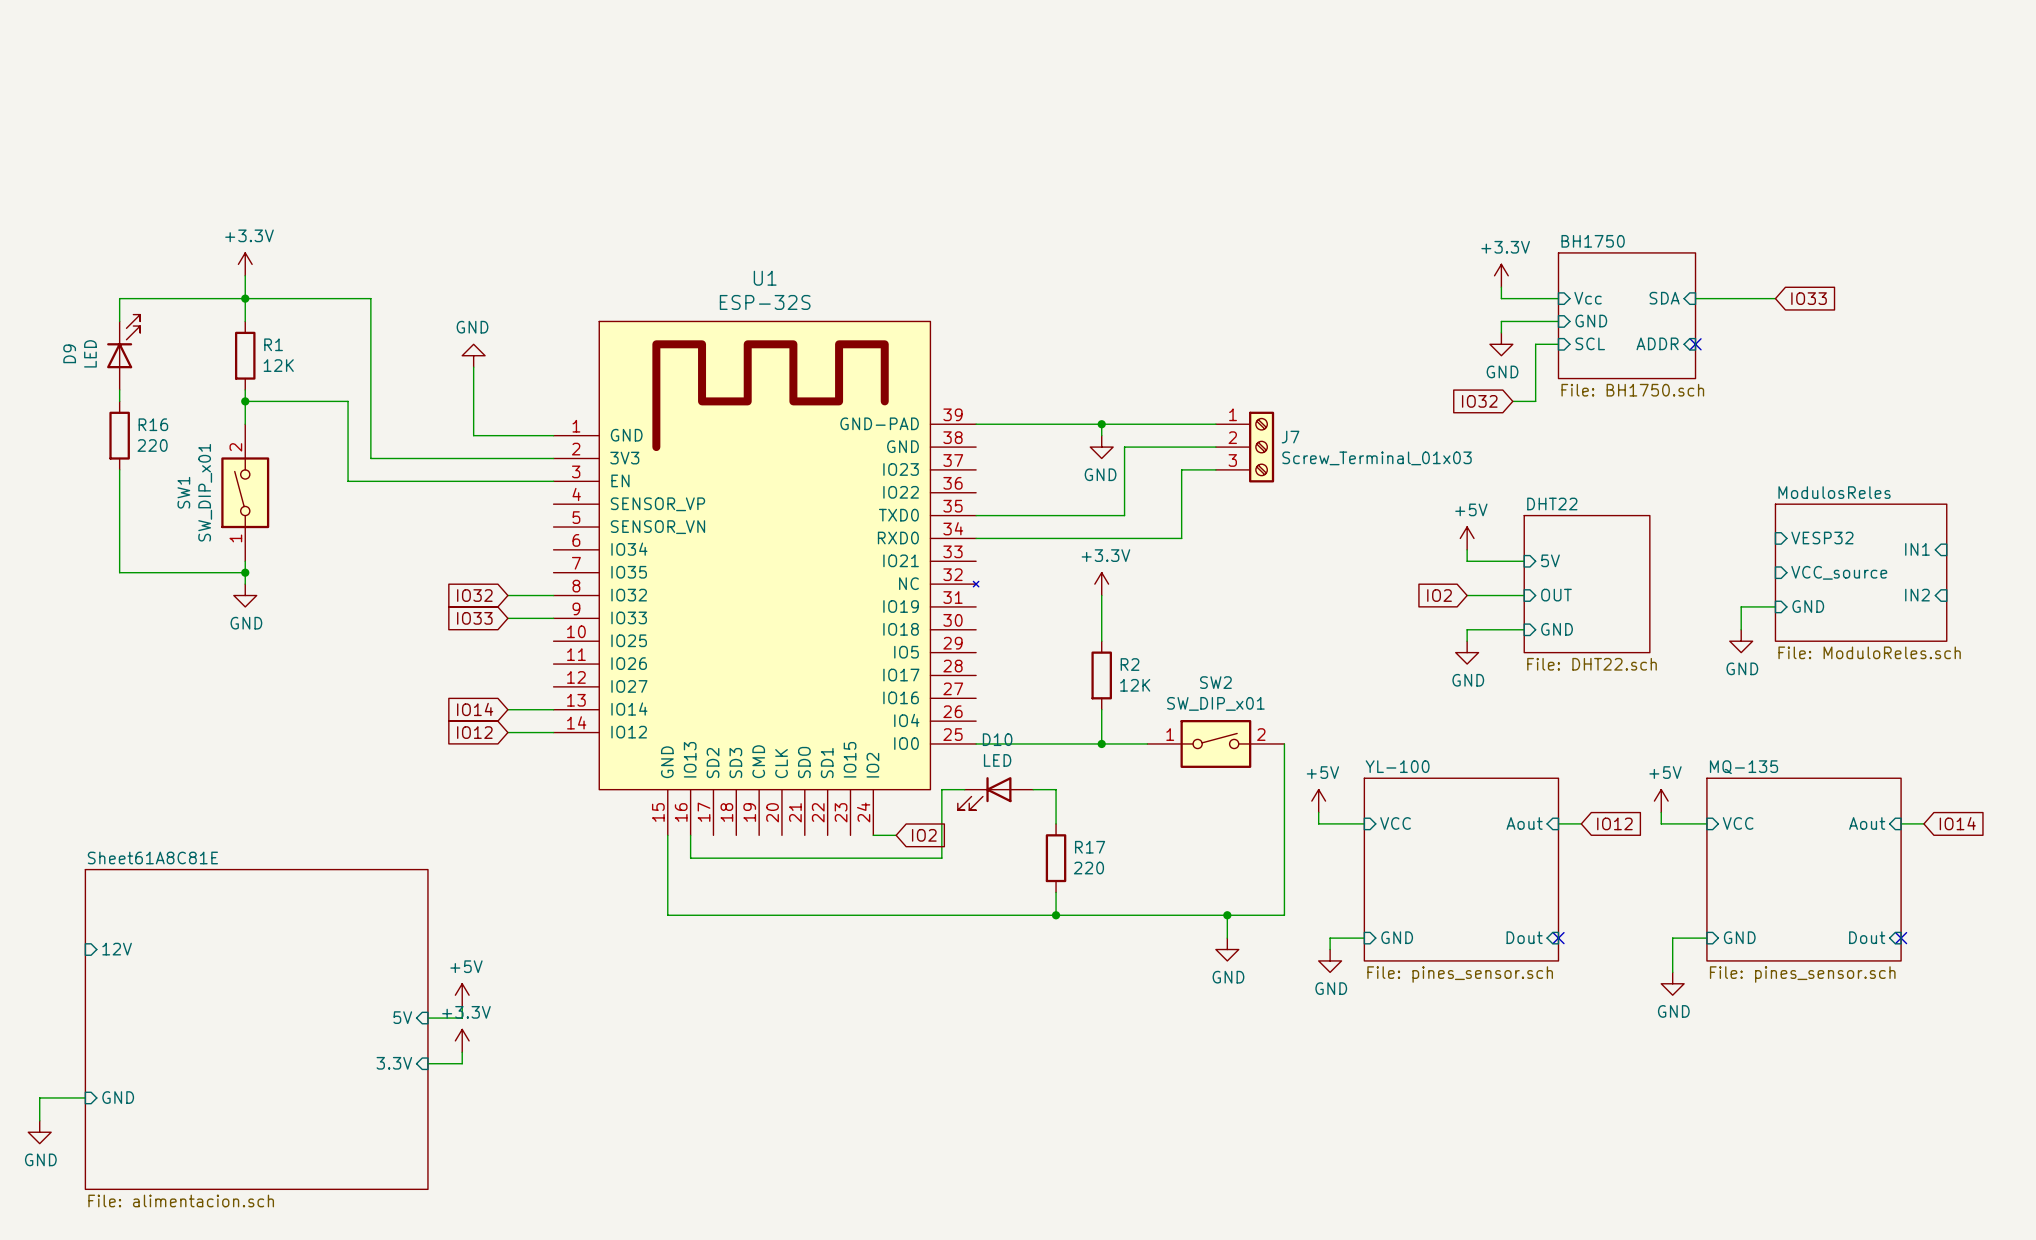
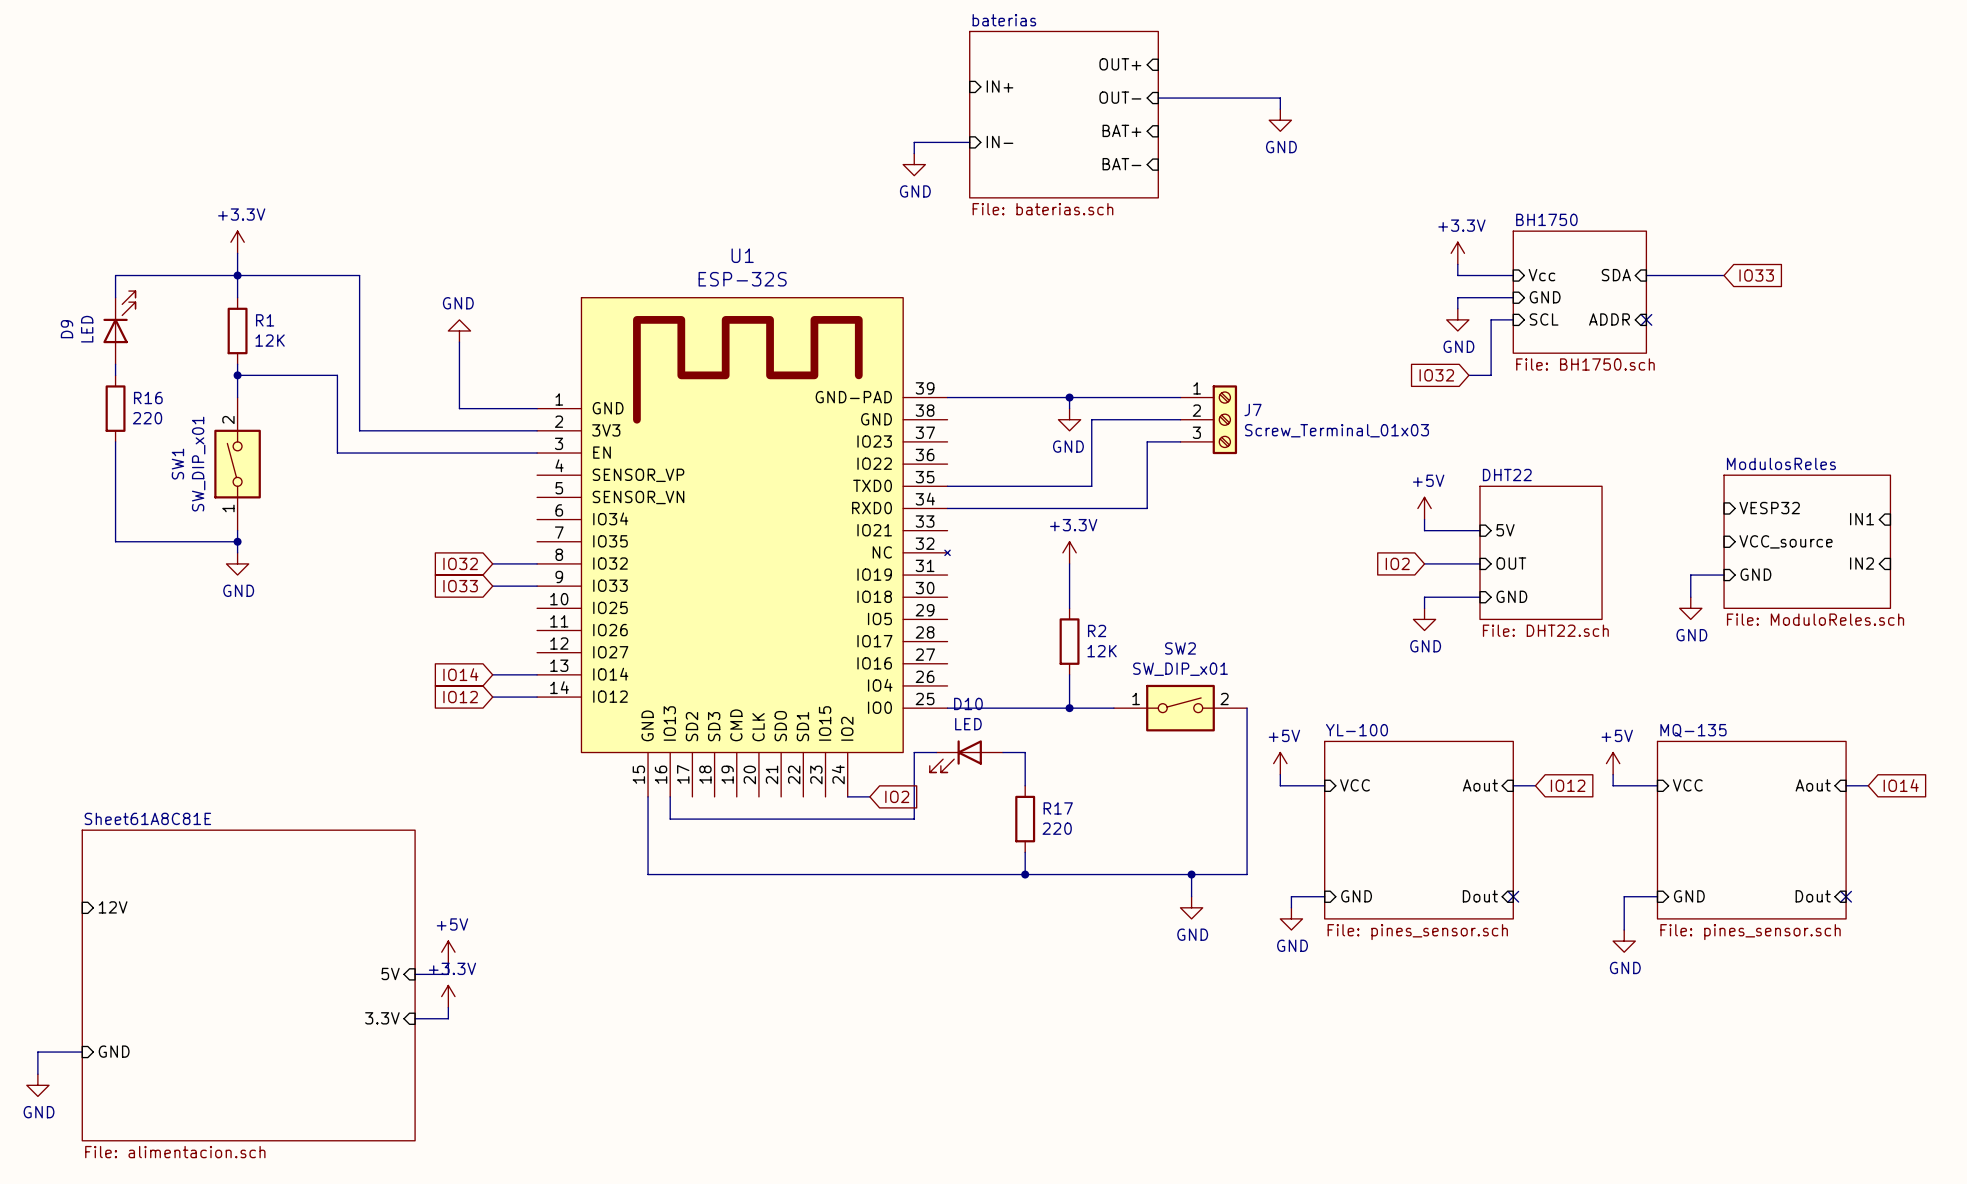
sheet pin: none -> OUT+ (1120, 64)
sheet pin: none -> IN+ (1000, 86)
sheet pin: none -> OUT- (1120, 97)
wire: none -> (1158, 98) (1280, 98) (1280, 109)
sheet baterias: none -> File: baterias.sch (1064, 114)
power symbol: none -> GND (1280, 120)
sheet pin: none -> BAT+ (1121, 130)
wire: none -> (969, 142) (914, 142) (914, 153)
sheet pin: none -> IN- (1000, 141)
power symbol: none -> GND (914, 164)
sheet pin: none -> BAT- (1121, 164)

